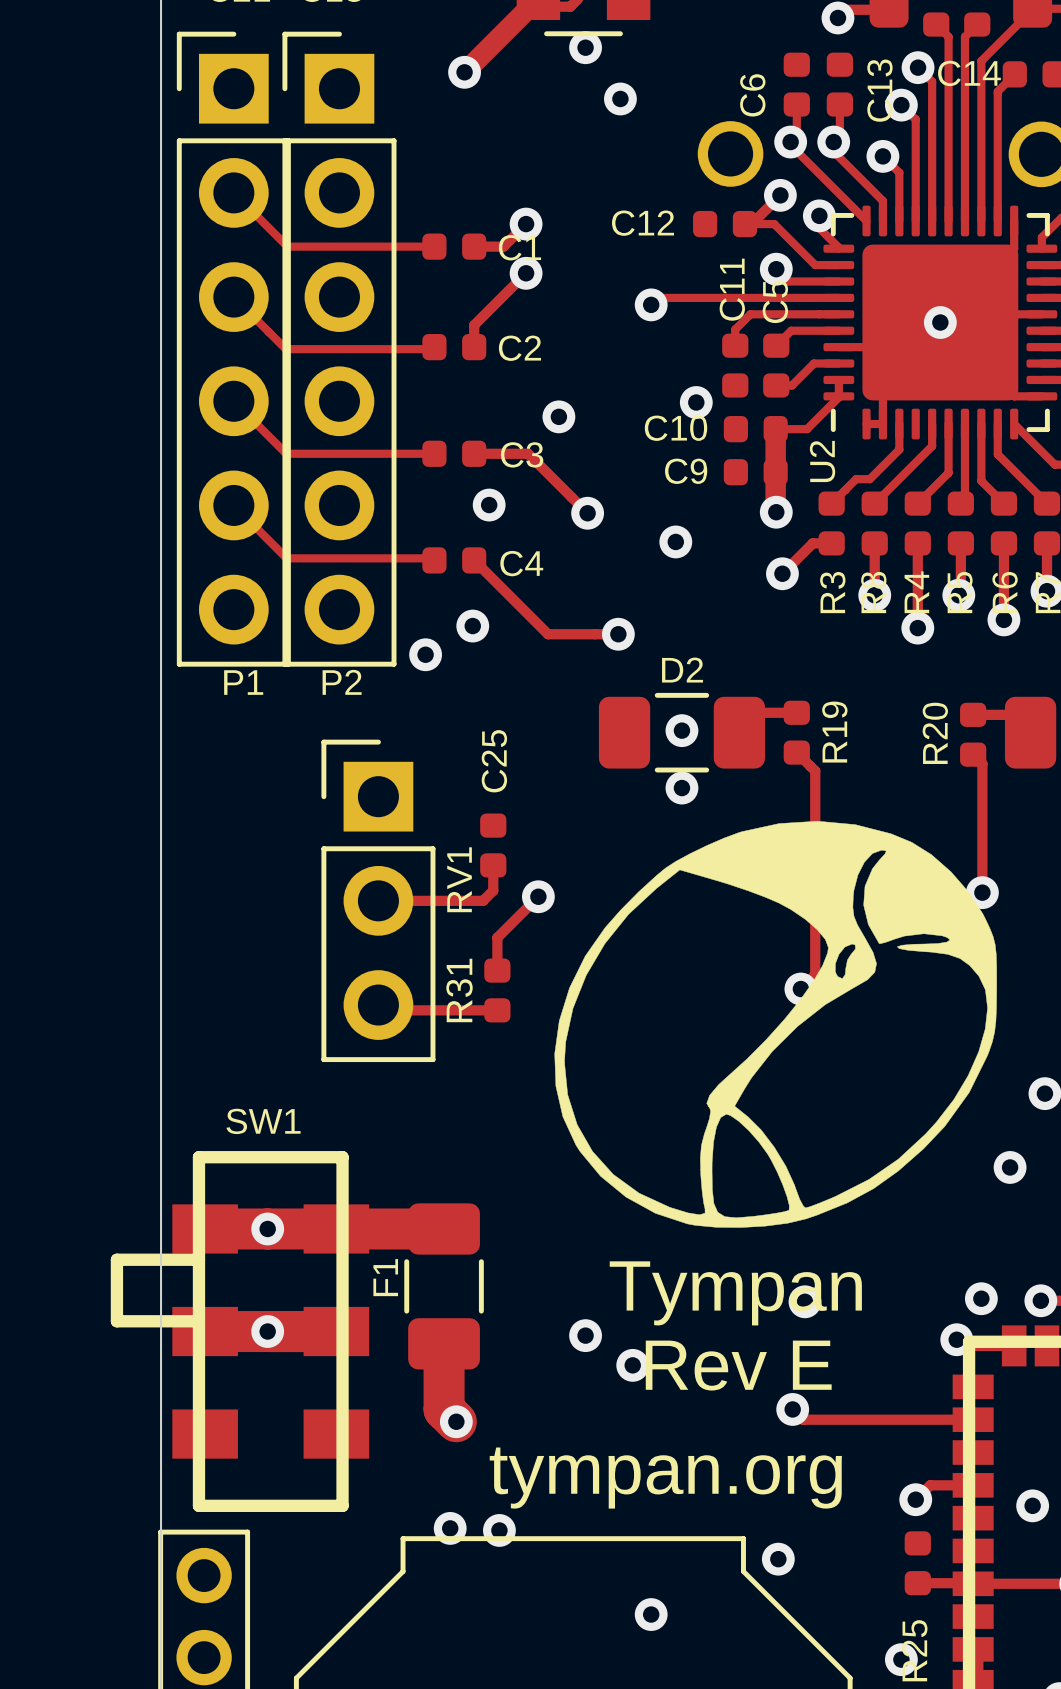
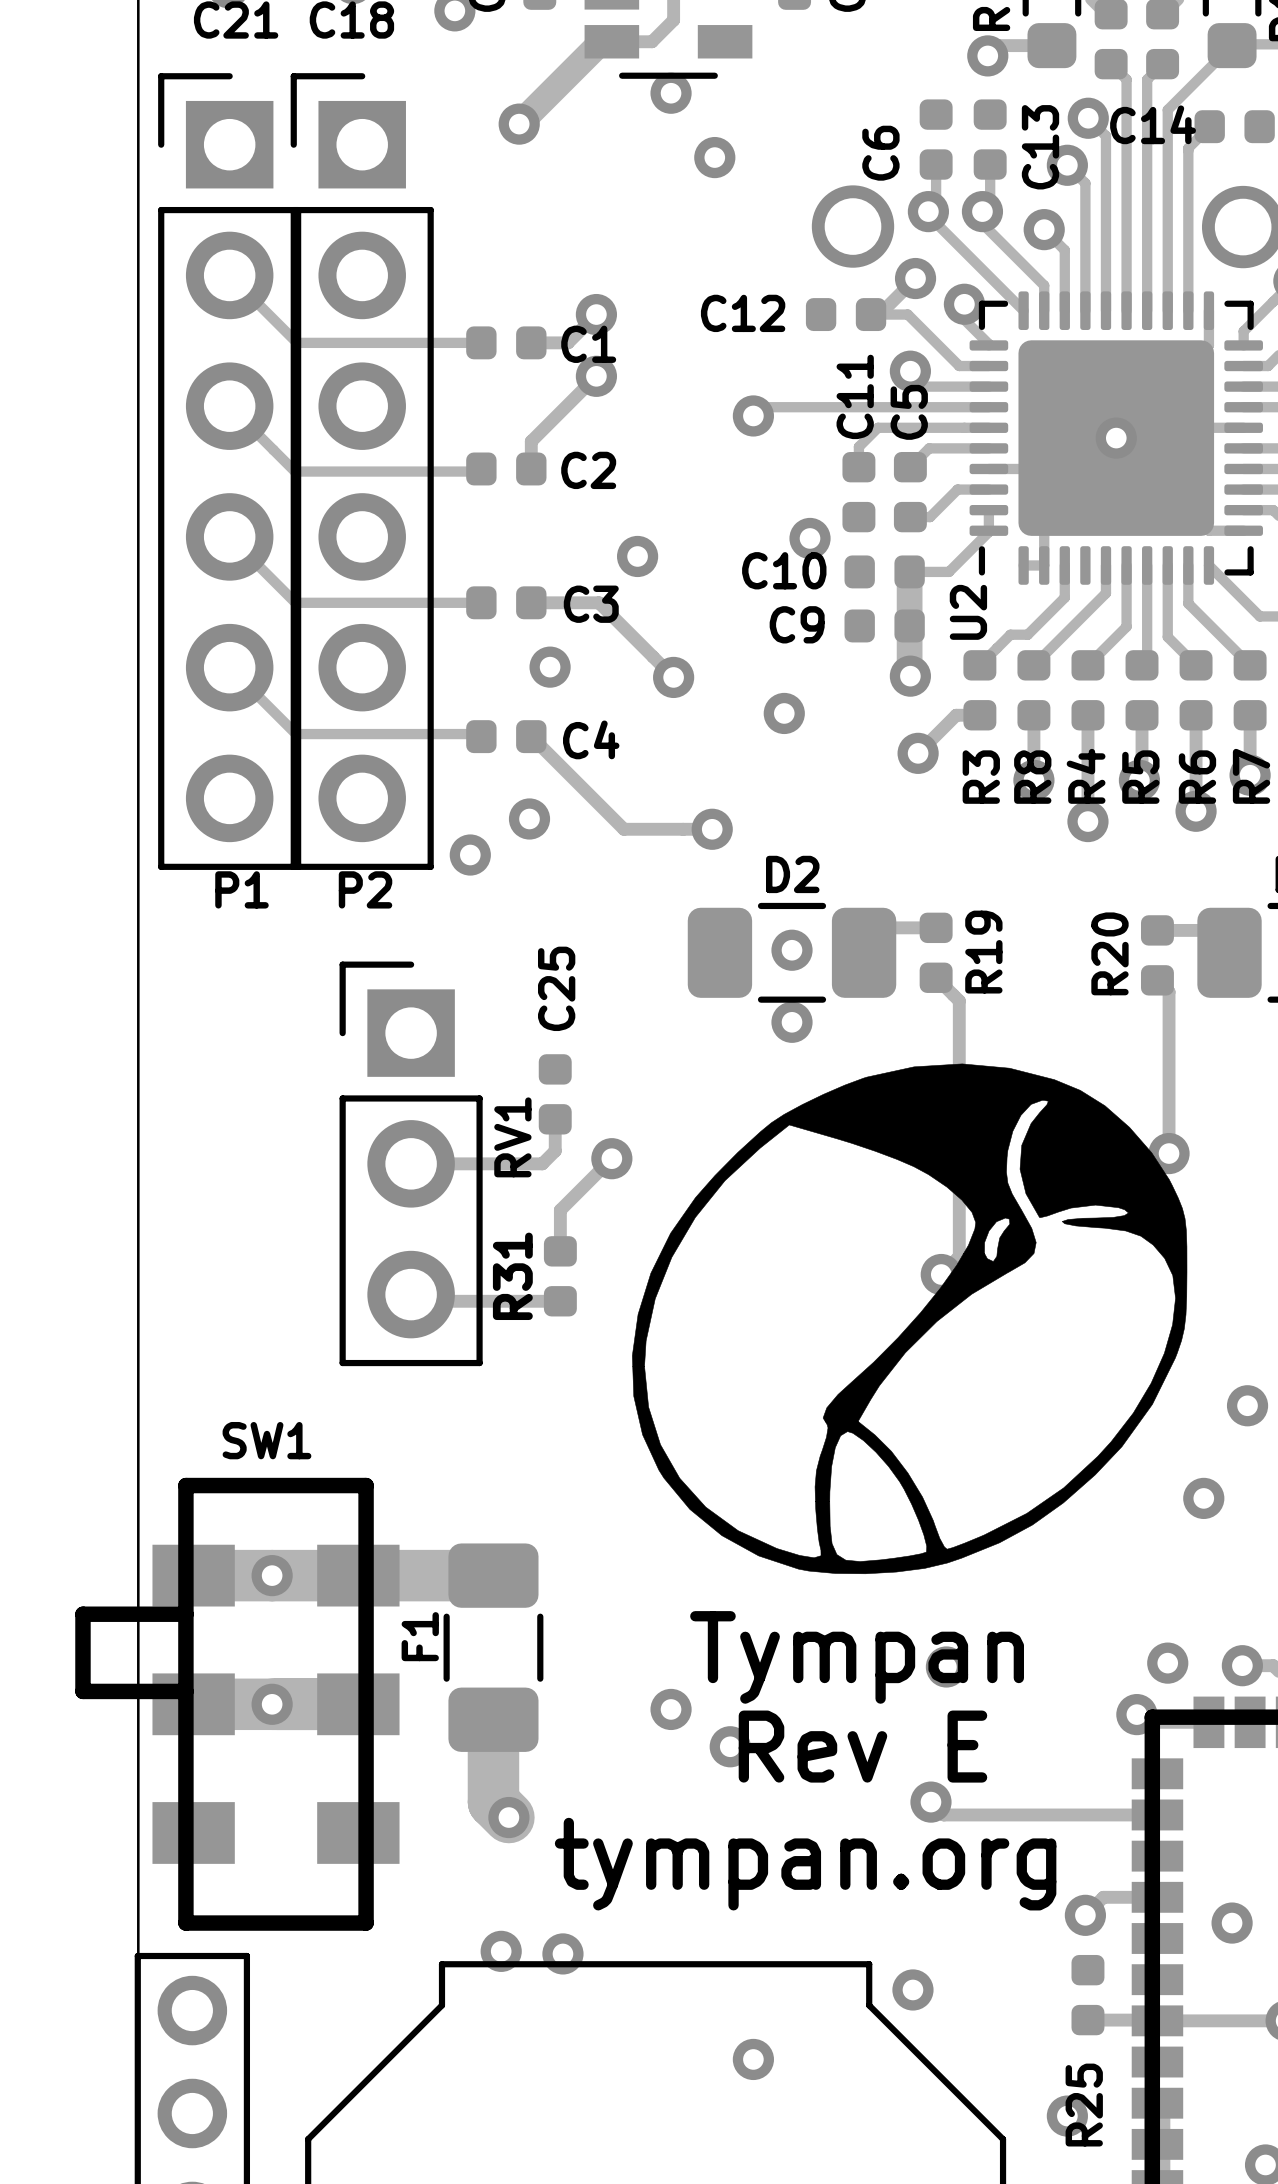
text position: tympan.org (665, 1478) -> tympan.org (805, 1864)

